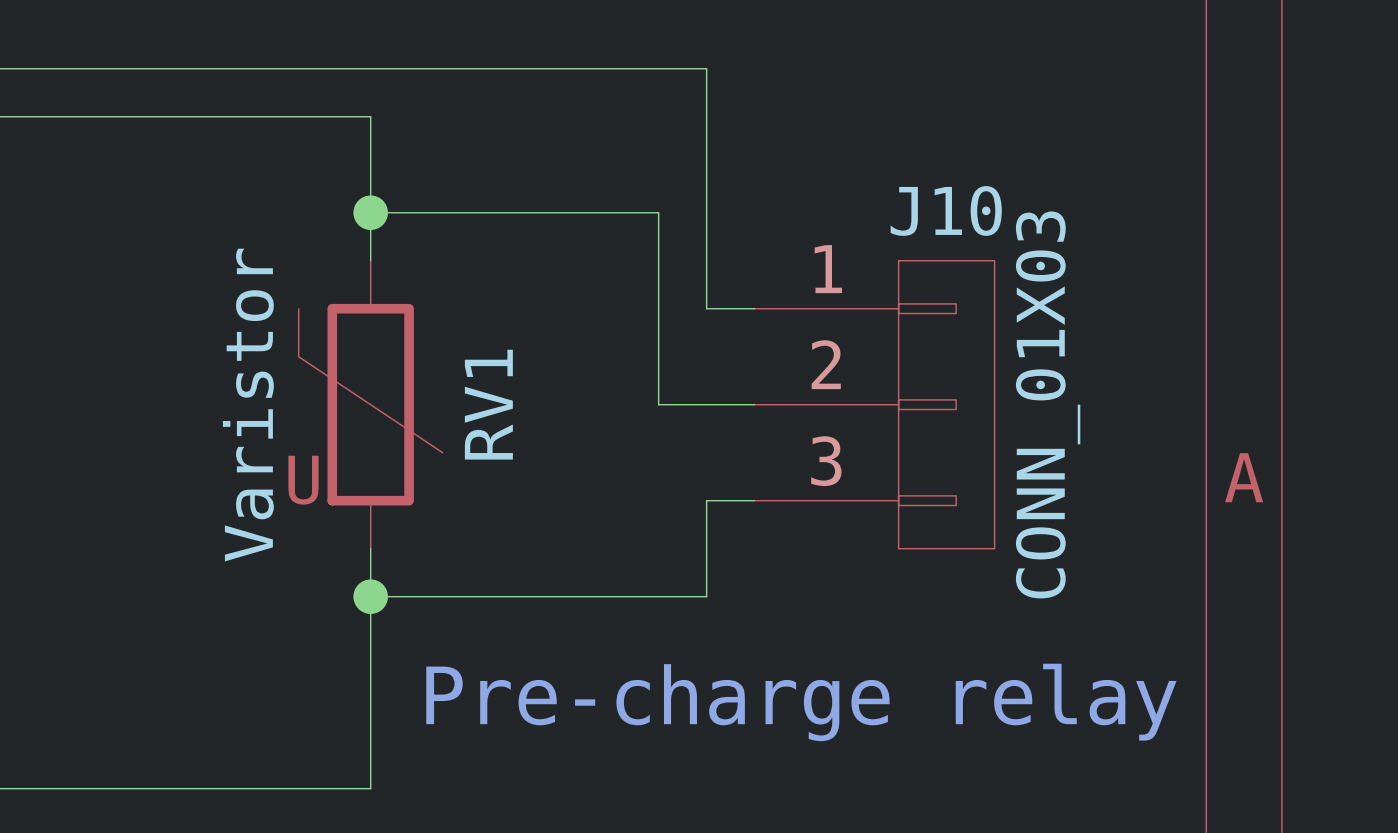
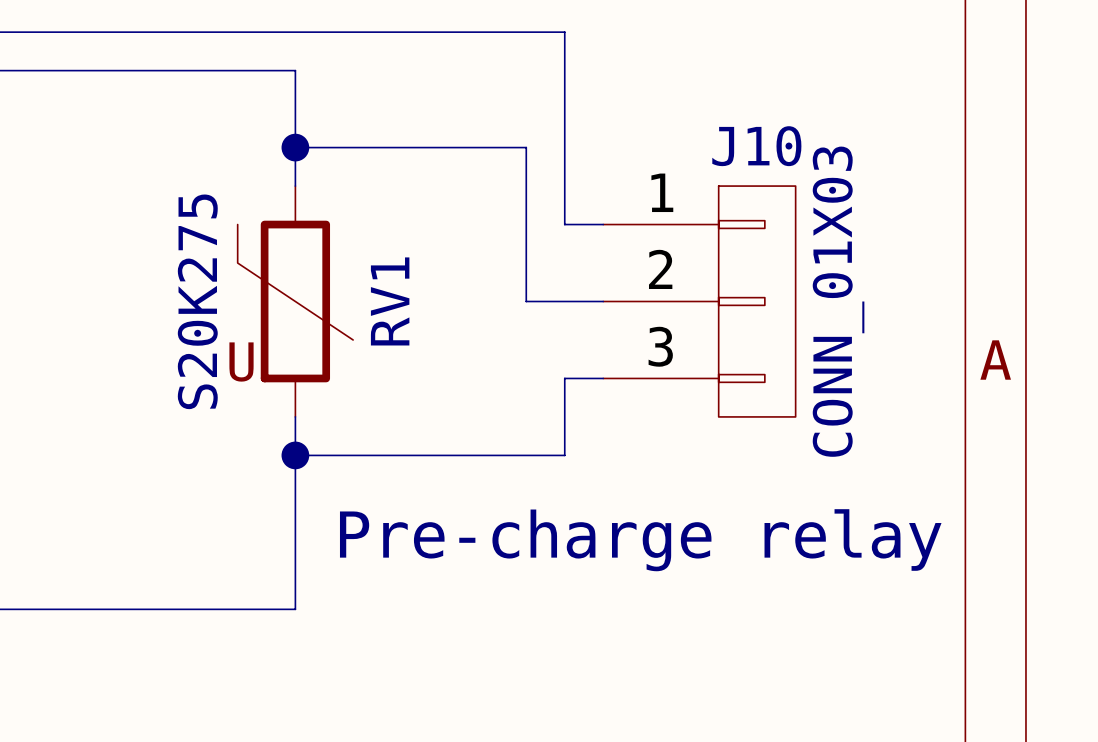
RV1 value: Varistor (248, 405) -> S20K275 (197, 301)

